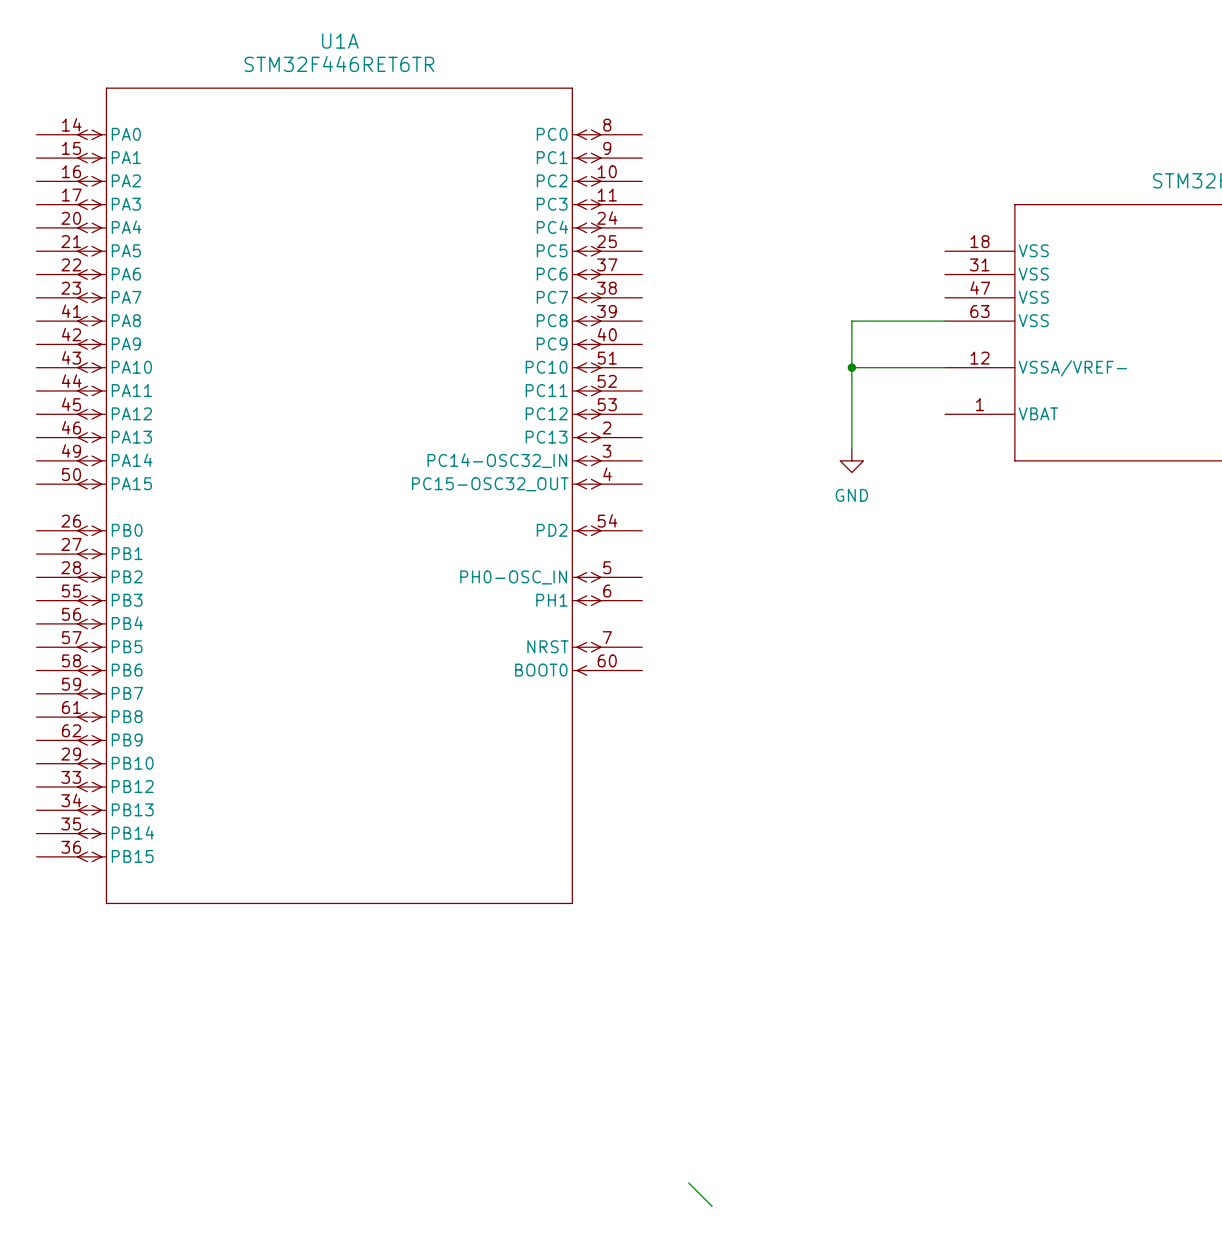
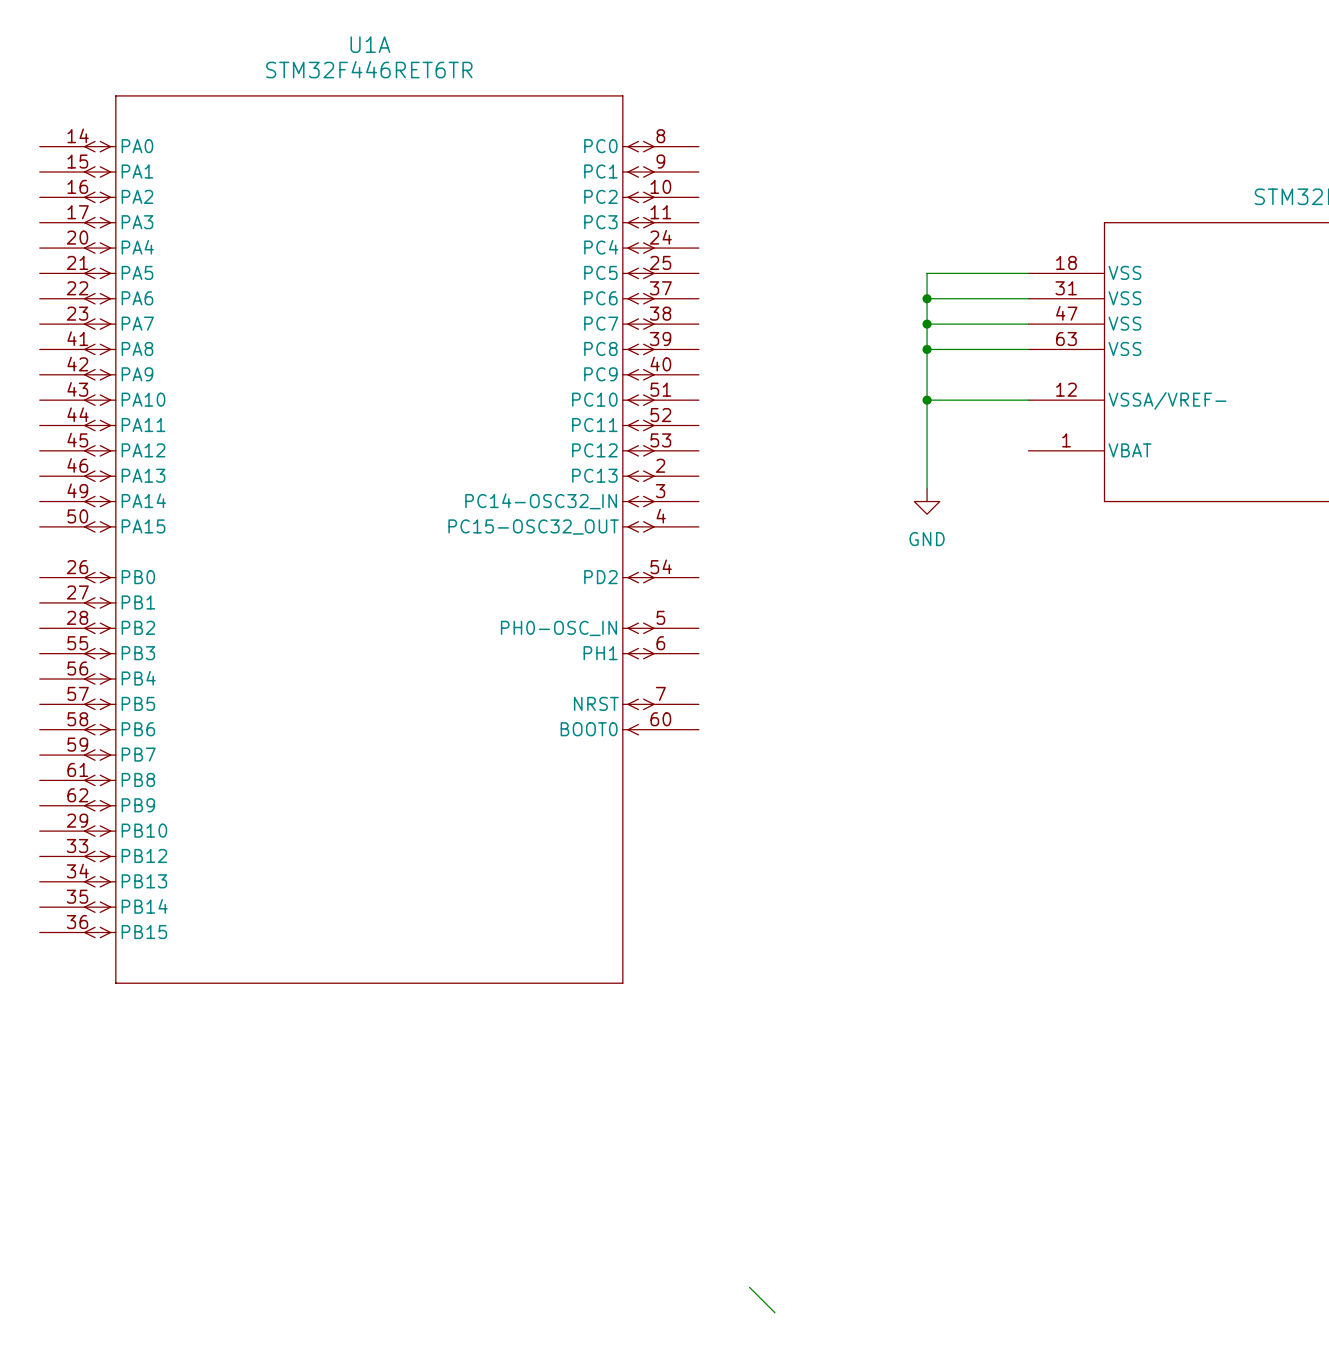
wire: none -> (1028, 273) (927, 273) (927, 349)
wire: none -> (927, 298) (1028, 298)
junction: none -> (927, 298)
wire: none -> (927, 324) (1028, 324)
junction: none -> (927, 324)
junction: none -> (927, 349)

